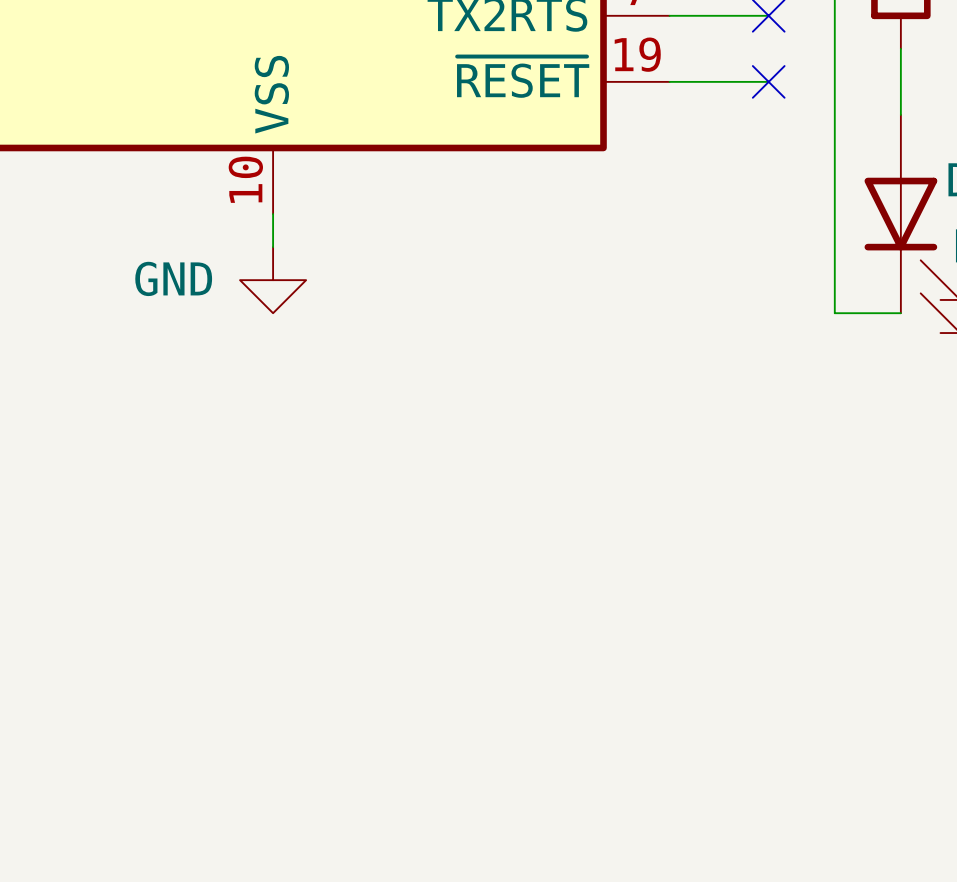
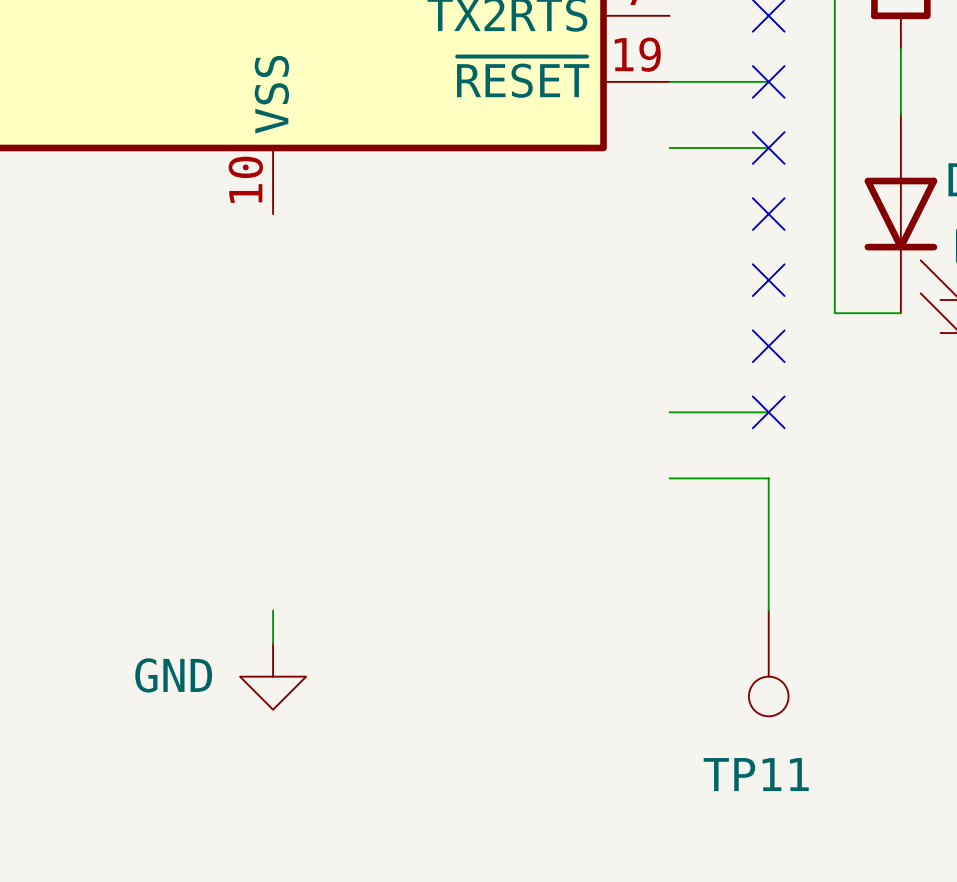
wire: (669, 15) (768, 15) -> (669, 412) (768, 412)
wire: none -> (669, 147) (768, 147)
no-connect mark: none -> (768, 147)
wire: (273, 214) (273, 247) -> (273, 610) (273, 643)
no-connect mark: none -> (768, 214)
power symbol position: GND (273, 280) -> GND (273, 676)
no-connect mark: none -> (768, 280)
no-connect mark: none -> (768, 346)
no-connect mark: none -> (768, 412)
wire: none -> (669, 478) (768, 478) (768, 610)
TP11: none -> (768, 663)

